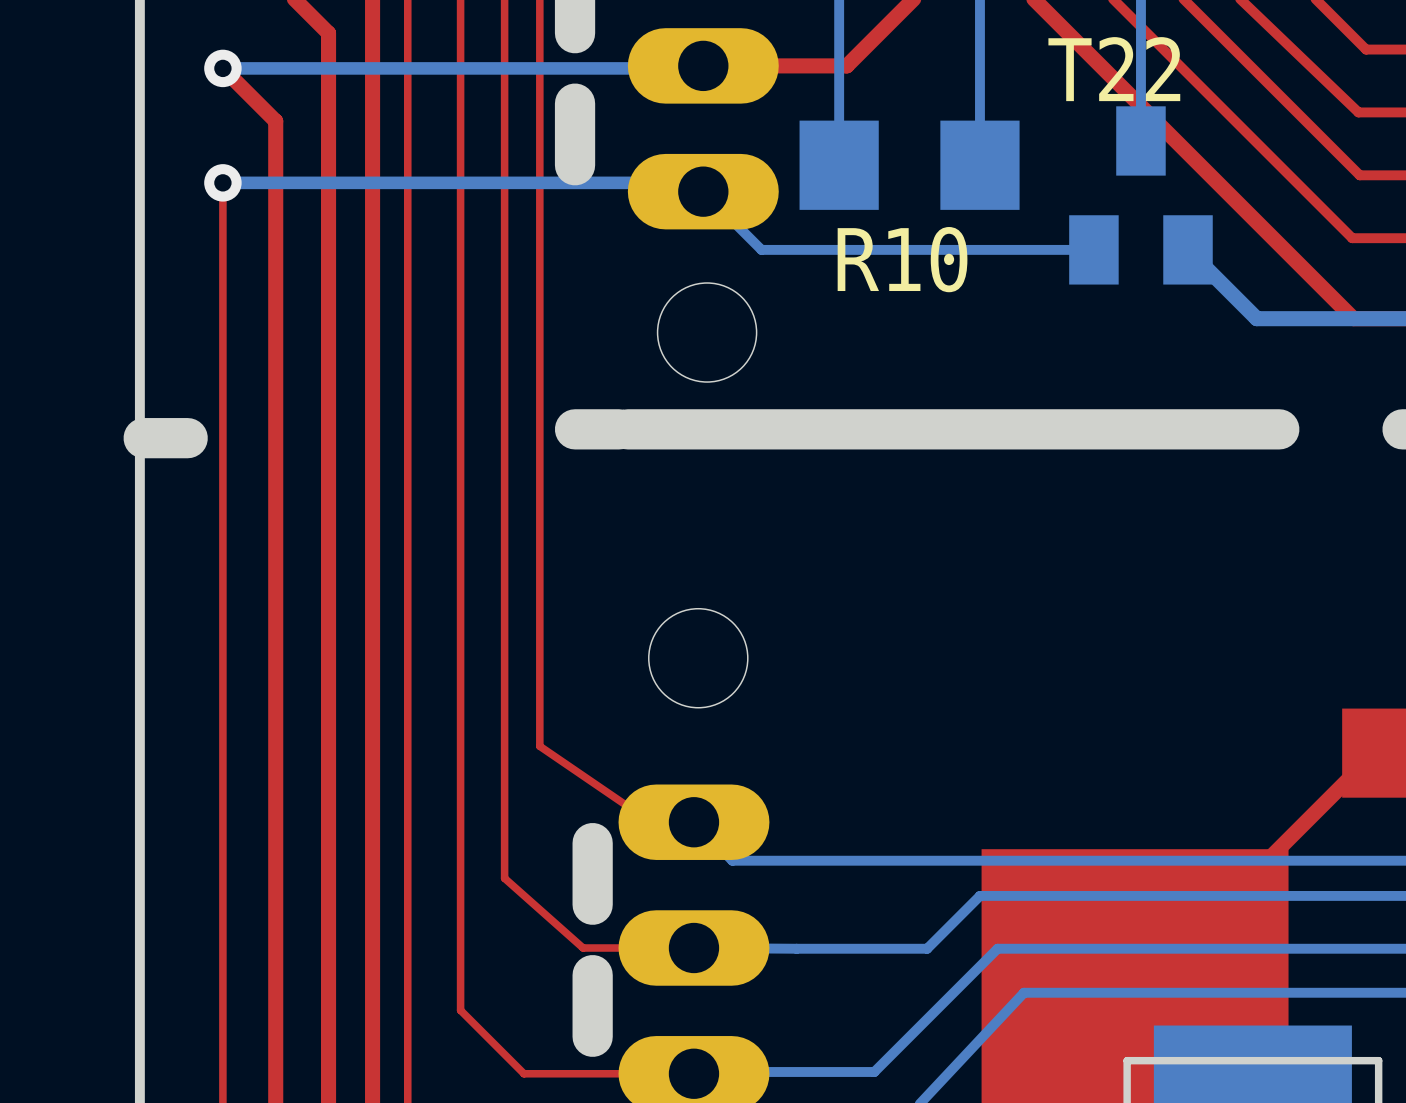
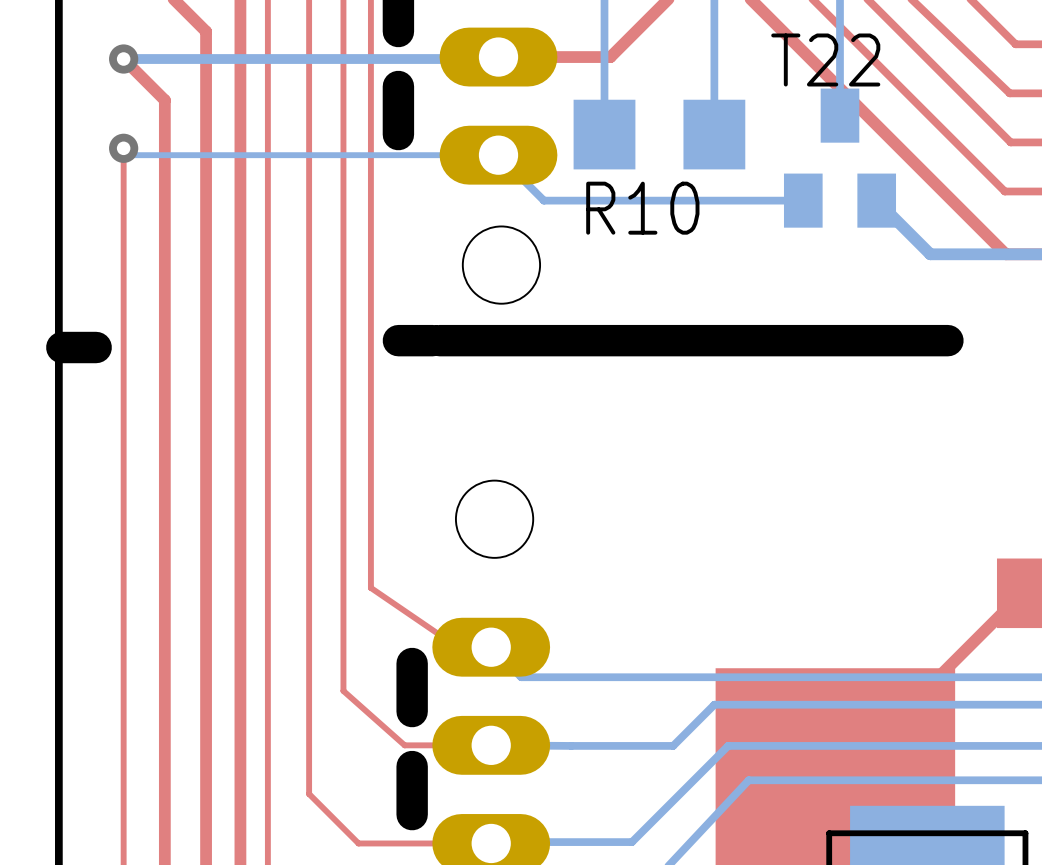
bottom track: (222, 182) (694, 182) (710, 198) -> none
bottom track: none -> (498, 155) (130, 155)

